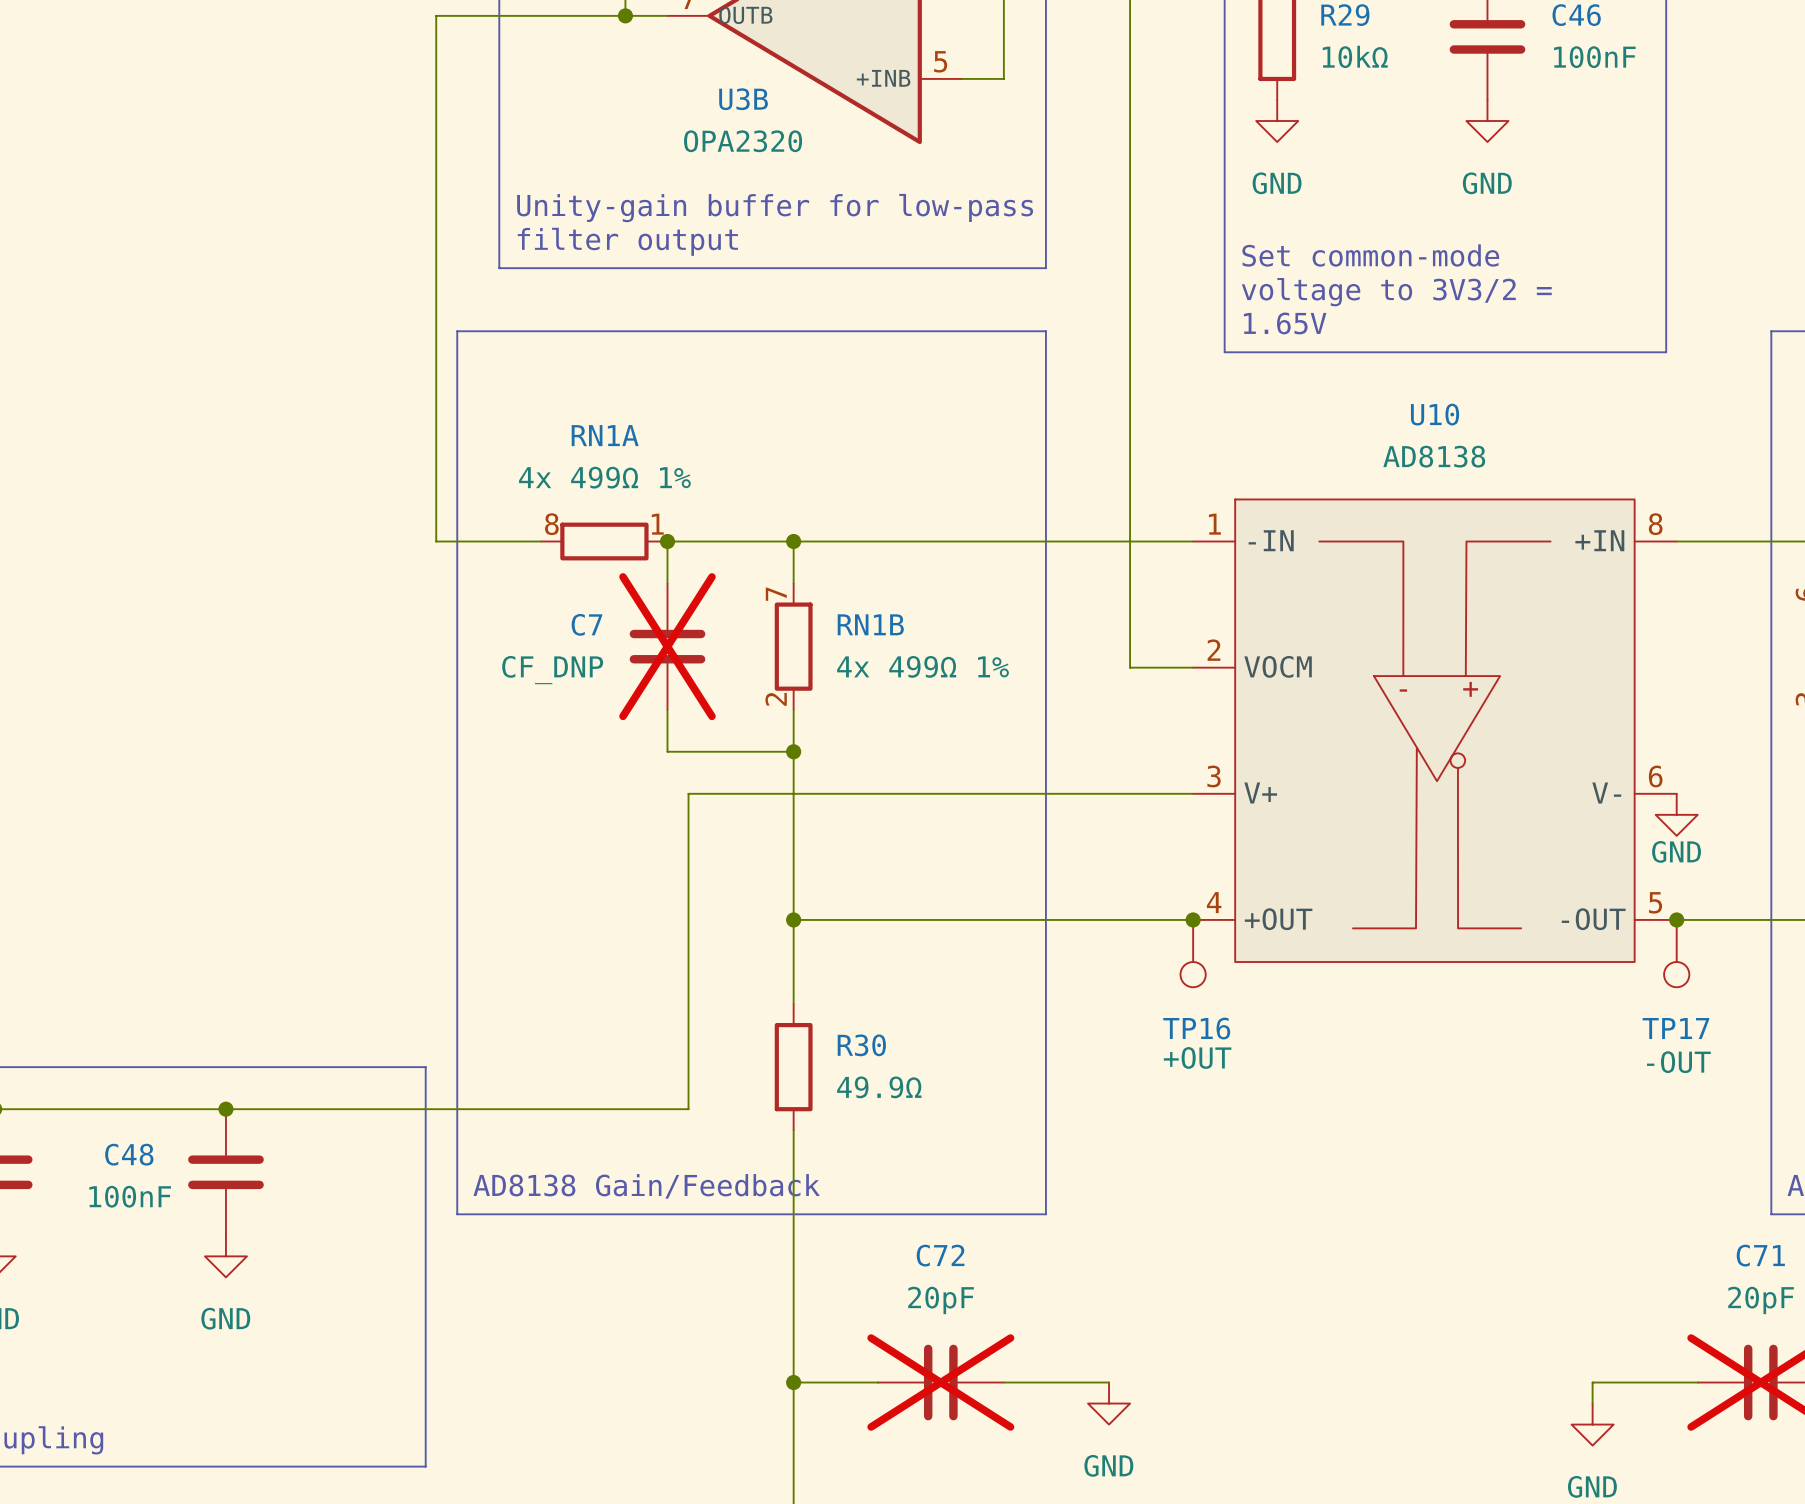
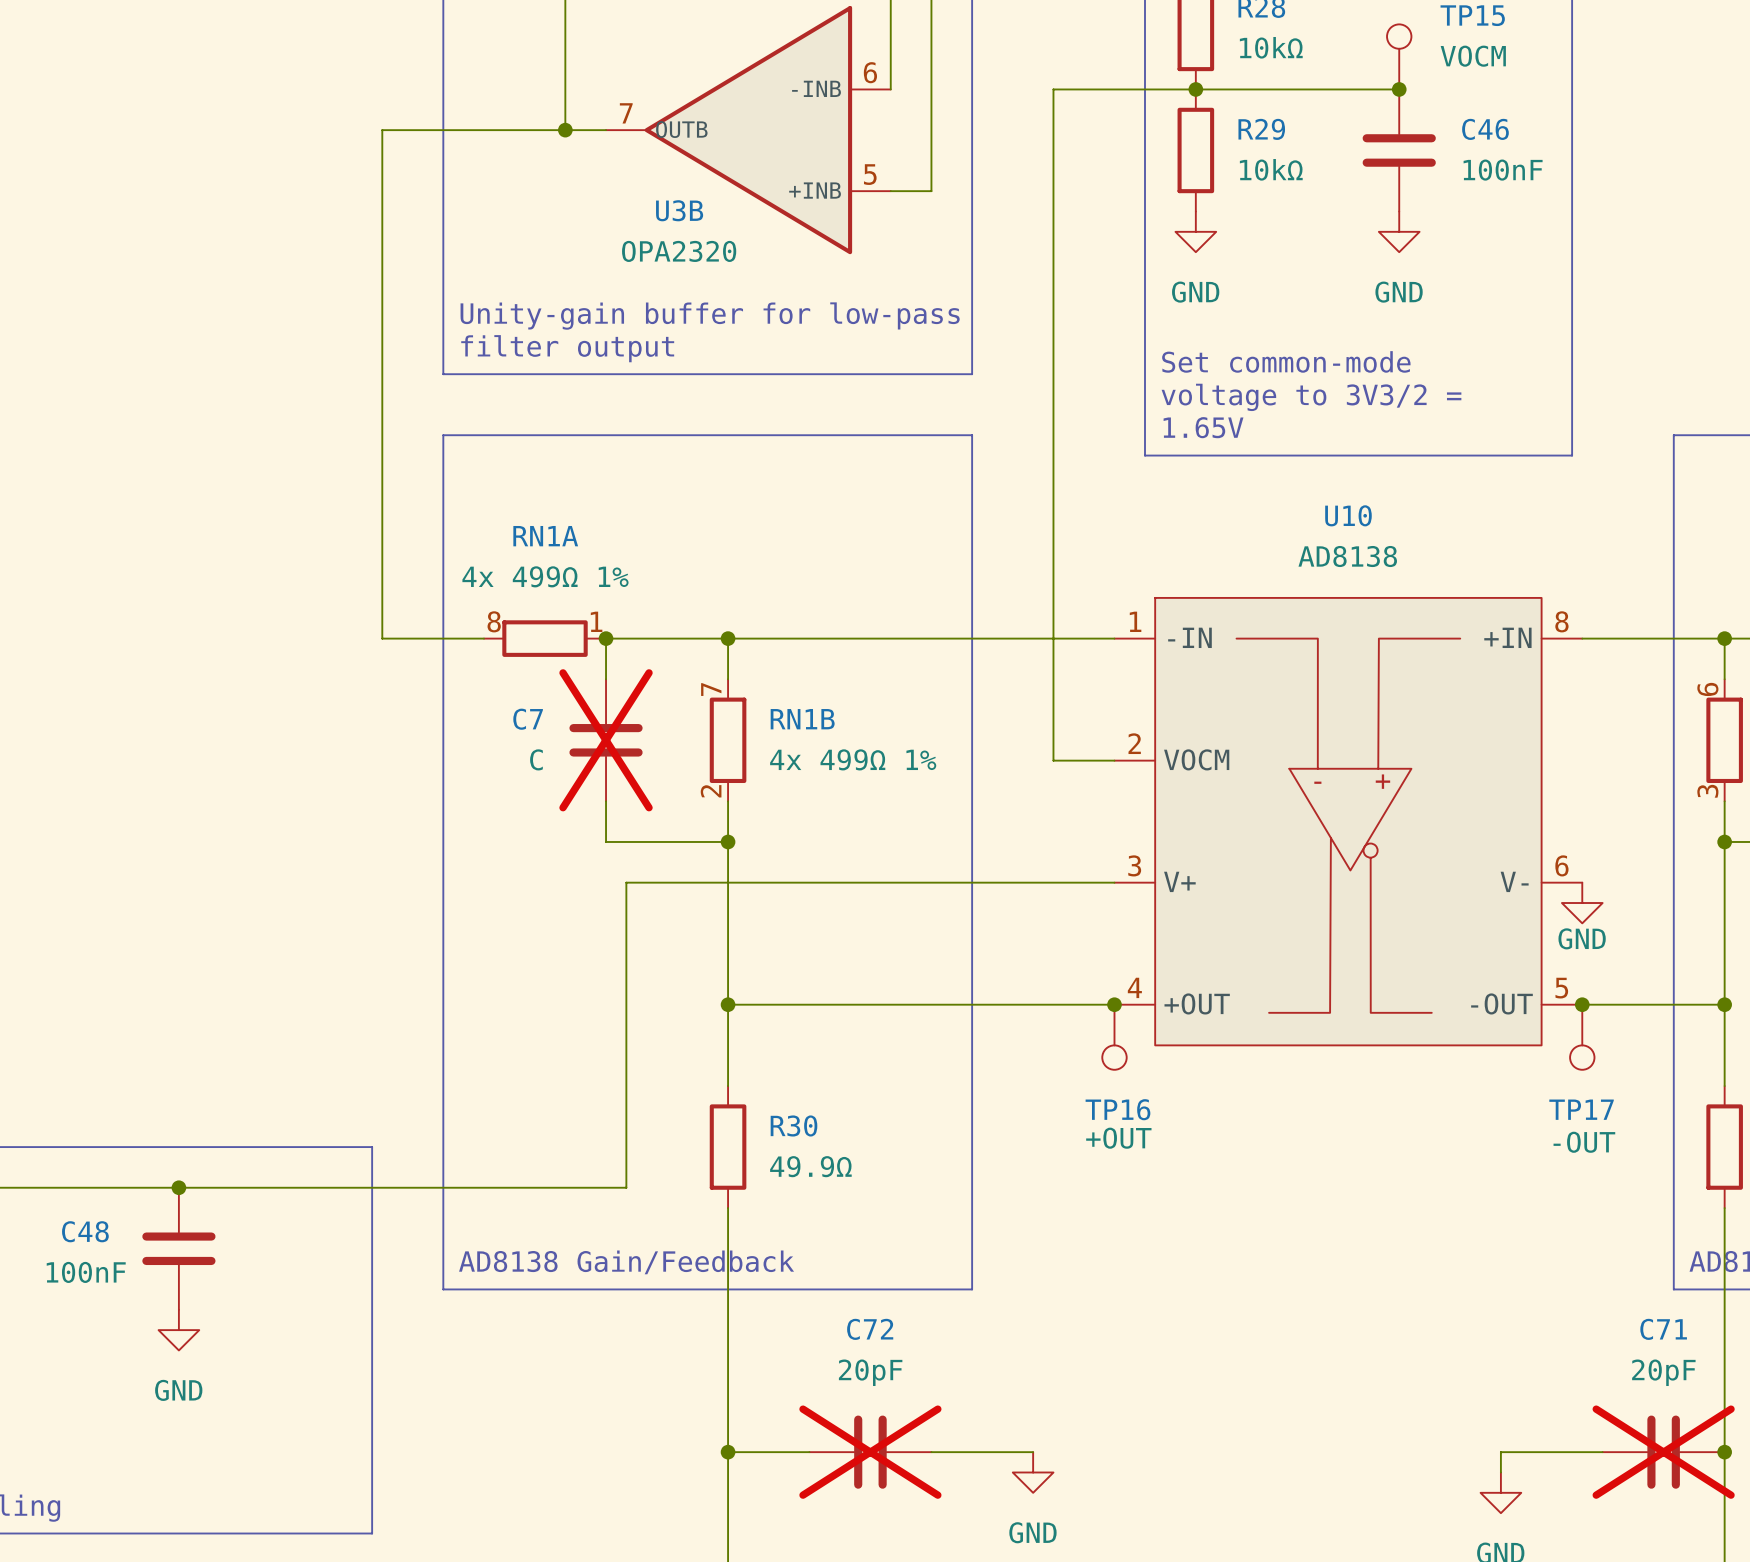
line: (499, 331) (457, 331) (457, 1214) (499, 1214) -> (443, 435) (443, 1289)
C7 value: CF_DNP (552, 670) -> C (536, 759)
text position: AD8138 Gain/Feedback (646, 1186) -> AD8138 Gain/Feedback (626, 1262)

